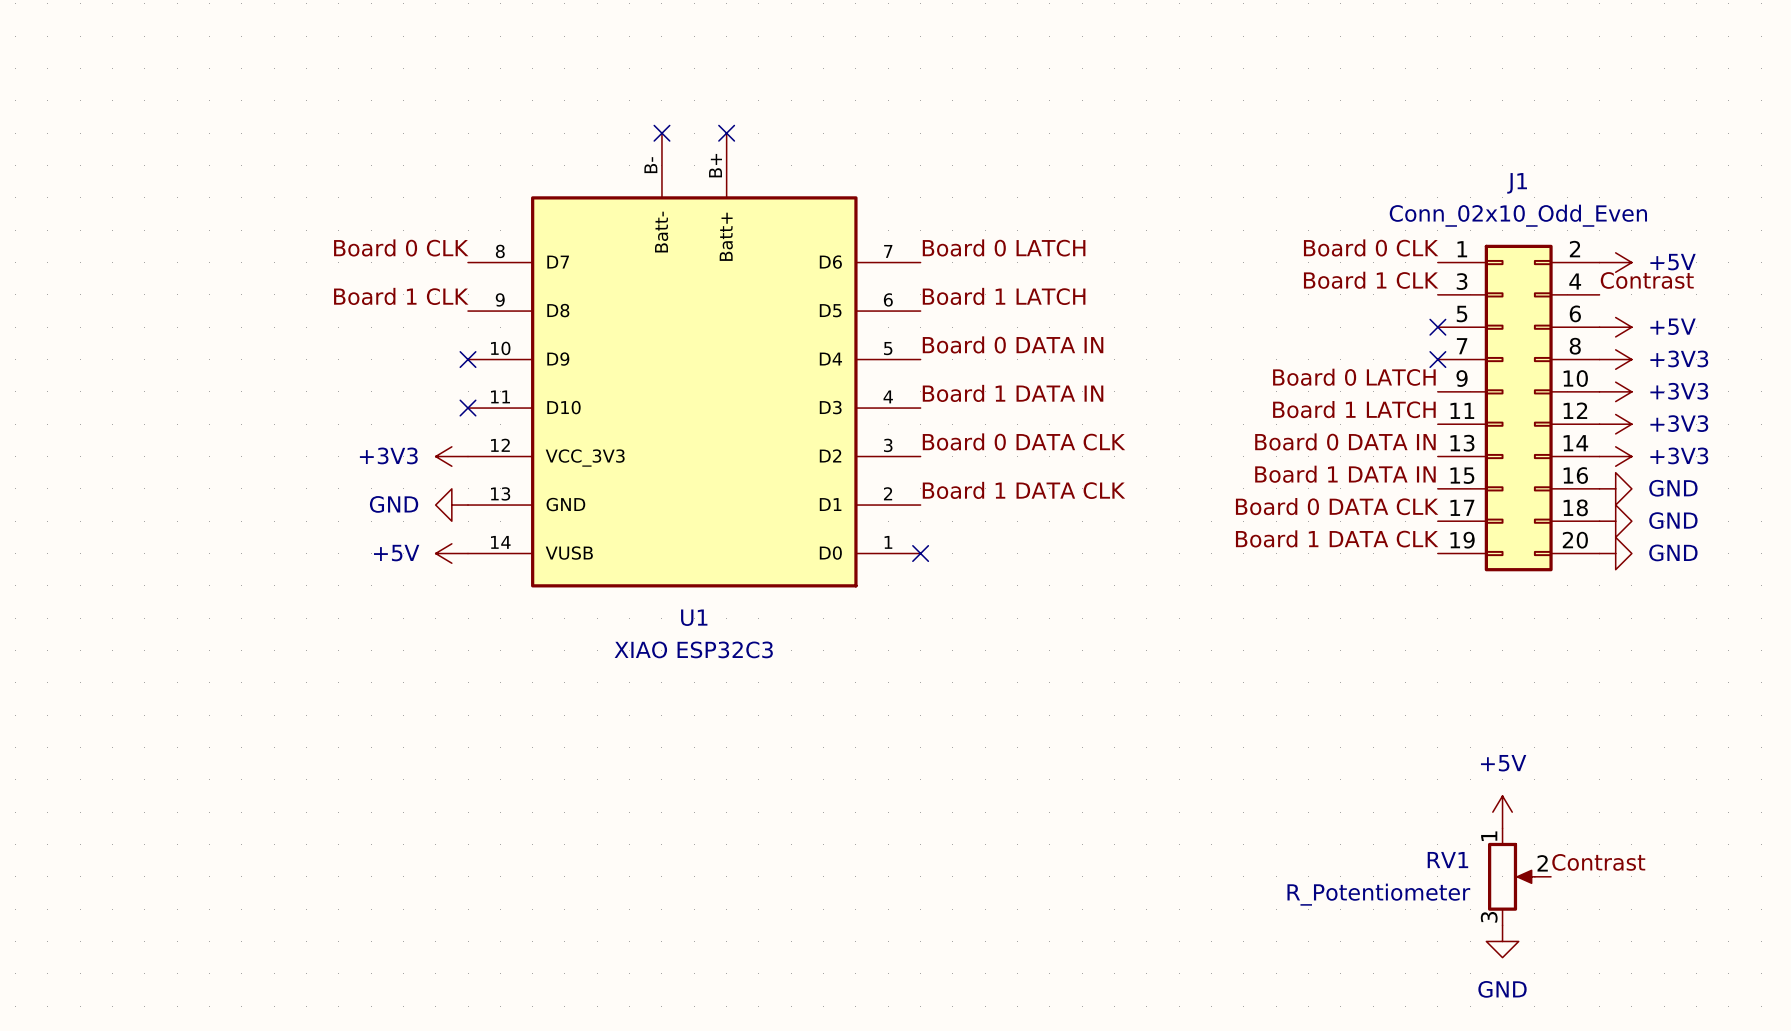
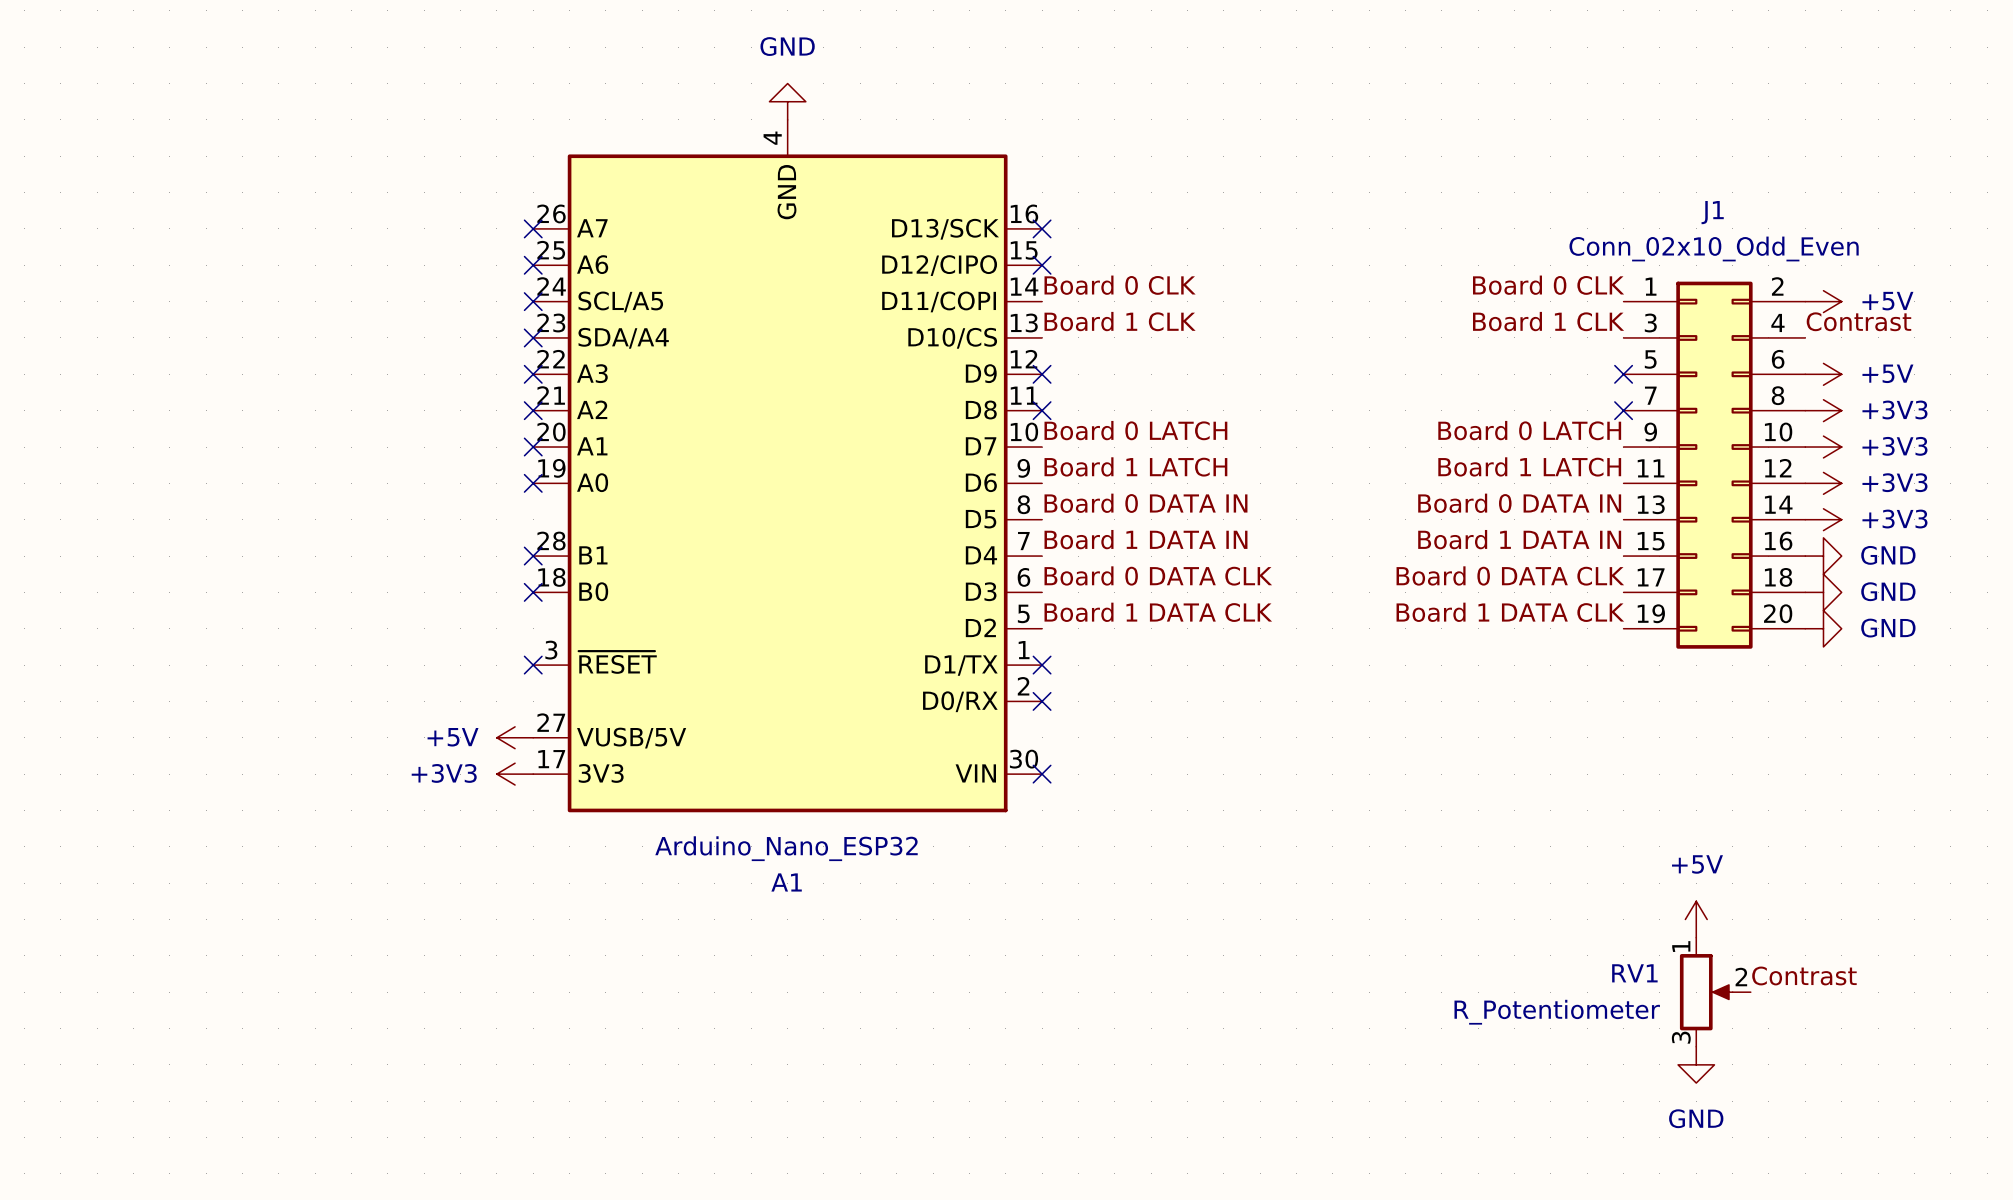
power symbol: none -> GND (787, 101)
no-connect mark: (661, 133) -> none
no-connect mark: (726, 133) -> none
no-connect mark: none -> (533, 228)
no-connect mark: none -> (1042, 228)
no-connect mark: none -> (533, 265)
no-connect mark: none -> (1042, 265)
label: Board 0 CLK (401, 247) -> none
label: Board 0 LATCH (1004, 247) -> Board 0 CLK (1120, 285)
no-connect mark: none -> (533, 301)
label: none -> Board 1 CLK (1120, 321)
no-connect mark: none -> (533, 337)
label: Board 1 CLK (401, 296) -> none
label position: Board 1 LATCH (1004, 296) -> Board 1 LATCH (1135, 466)
no-connect mark: none -> (533, 374)
no-connect mark: none -> (1042, 374)
label: Board 0 DATA IN (1013, 344) -> Board 0 LATCH (1135, 430)
no-connect mark: none -> (1042, 410)
U1: XIAO ESP32C3 (694, 360) -> none
no-connect mark: none -> (533, 447)
label position: Board 1 DATA IN (1013, 393) -> Board 1 DATA IN (1145, 539)
no-connect mark: (468, 408) -> none
A1: none -> Arduino_Nano_ESP32 (787, 466)
no-connect mark: none -> (533, 483)
label: Board 0 DATA CLK (1023, 441) -> Board 0 DATA IN (1145, 503)
power symbol position: +3V3 (451, 456) -> +3V3 (515, 774)
no-connect mark: none -> (533, 556)
label position: Board 1 DATA CLK (1023, 490) -> Board 1 DATA CLK (1158, 612)
power symbol: GND (451, 505) -> none
label: none -> Board 0 DATA CLK (1158, 575)
no-connect mark: none -> (533, 592)
power symbol position: +5V (451, 553) -> +5V (515, 737)
no-connect mark: (920, 553) -> none
no-connect mark: none -> (533, 665)
no-connect mark: none -> (1042, 665)
no-connect mark: none -> (1042, 701)
no-connect mark: none -> (1042, 774)

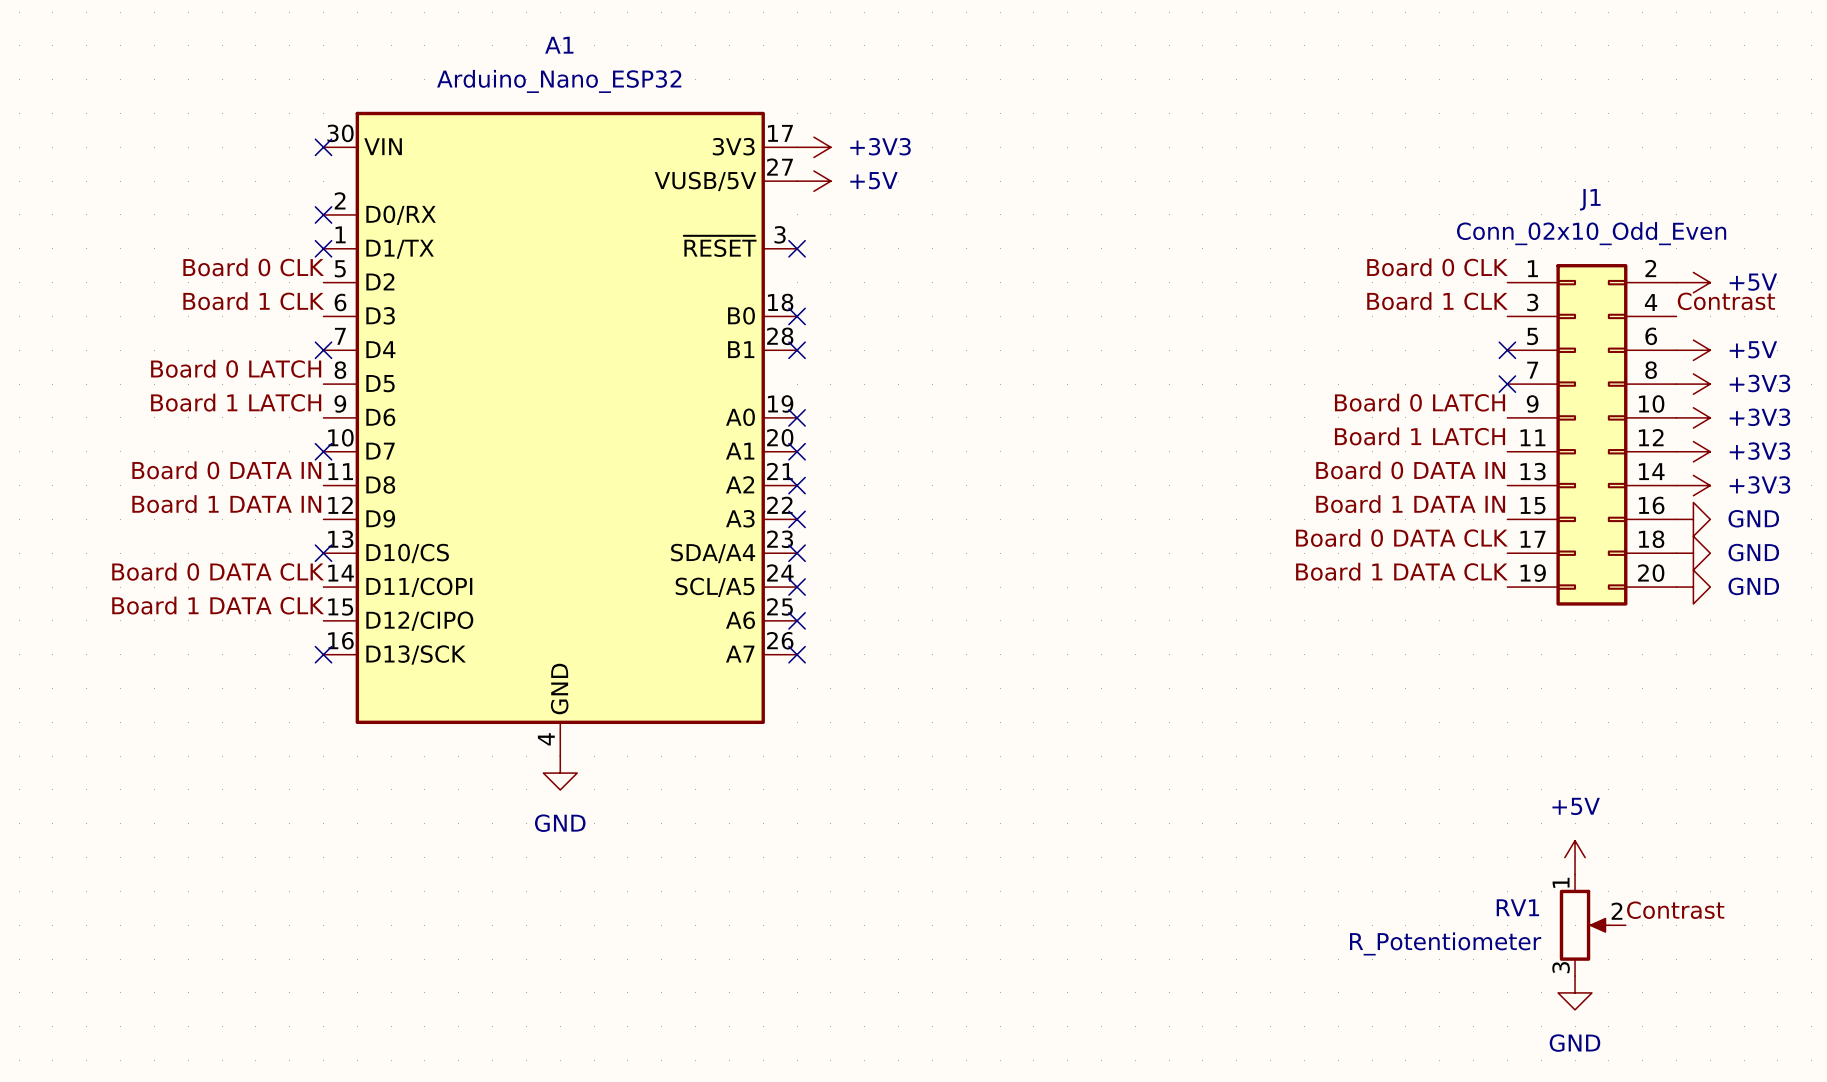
power symbol: GND (787, 101) -> none
no-connect mark: none -> (323, 147)
power symbol: none -> +3V3 (813, 147)
power symbol: none -> +5V (813, 181)
no-connect mark: none -> (323, 214)
no-connect mark: (533, 228) -> none
no-connect mark: (1042, 228) -> none
no-connect mark: none -> (323, 248)
no-connect mark: (533, 265) -> none
no-connect mark: none -> (797, 248)
no-connect mark: (1042, 265) -> none
label: none -> Board 0 CLK (253, 267)
label: Board 0 CLK (1120, 285) -> none
no-connect mark: (533, 301) -> none
label: none -> Board 1 CLK (253, 301)
label: Board 1 CLK (1120, 321) -> none
no-connect mark: (533, 337) -> none
no-connect mark: none -> (797, 316)
no-connect mark: none -> (323, 350)
no-connect mark: (533, 374) -> none
no-connect mark: none -> (797, 350)
no-connect mark: (1042, 374) -> none
label: none -> Board 0 LATCH (236, 368)
no-connect mark: (533, 410) -> none
no-connect mark: (1042, 410) -> none
label: none -> Board 1 LATCH (236, 402)
label: Board 0 LATCH (1135, 430) -> none
no-connect mark: (533, 447) -> none
no-connect mark: none -> (797, 417)
label: Board 1 LATCH (1135, 466) -> none
no-connect mark: none -> (323, 451)
no-connect mark: (533, 483) -> none
A1 rotation: 0° (787, 483) -> 180° (560, 417)
no-connect mark: none -> (797, 451)
label: none -> Board 0 DATA IN (226, 470)
label: Board 0 DATA IN (1145, 503) -> none
no-connect mark: none -> (797, 485)
label: none -> Board 1 DATA IN (226, 504)
label: Board 1 DATA IN (1145, 539) -> none
no-connect mark: (533, 556) -> none
no-connect mark: none -> (797, 519)
label: Board 0 DATA CLK (1158, 575) -> none
no-connect mark: none -> (323, 553)
no-connect mark: (533, 592) -> none
no-connect mark: none -> (797, 553)
label: none -> Board 0 DATA CLK (218, 571)
label: Board 1 DATA CLK (1158, 612) -> none
no-connect mark: none -> (797, 587)
label: none -> Board 1 DATA CLK (218, 605)
no-connect mark: (533, 665) -> none
no-connect mark: none -> (797, 620)
no-connect mark: (1042, 665) -> none
no-connect mark: none -> (323, 654)
no-connect mark: none -> (797, 654)
no-connect mark: (1042, 701) -> none
power symbol: +5V (515, 737) -> none
power symbol: +3V3 (515, 774) -> none
no-connect mark: (1042, 774) -> none
power symbol: none -> GND (560, 773)

